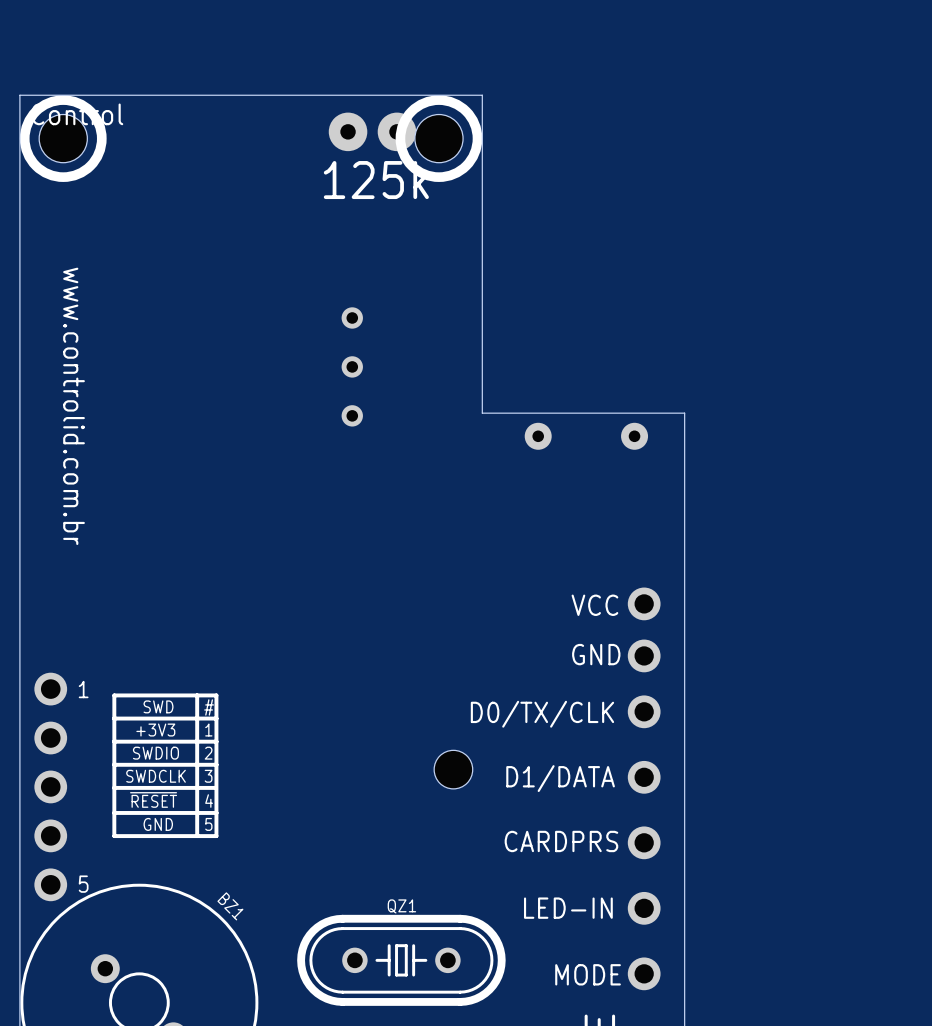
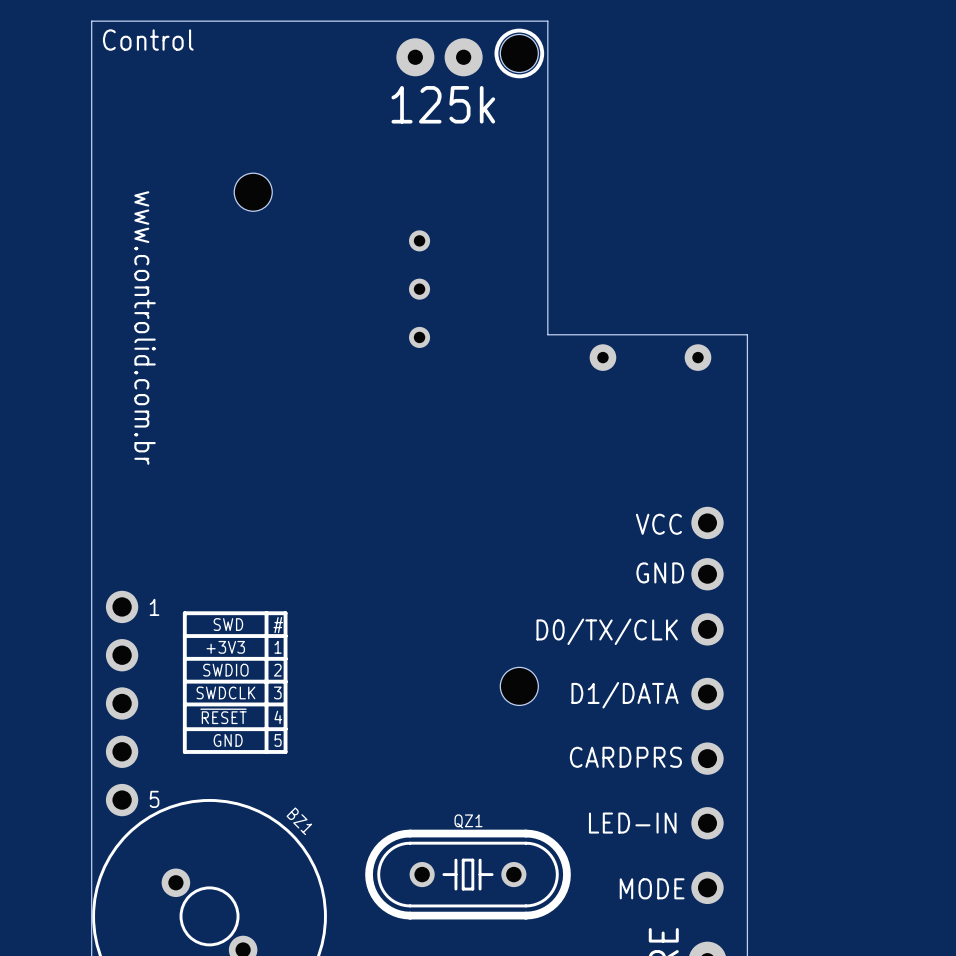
drawing: [19, 95, 107, 182] -> none
drawing shape: [395, 95, 483, 182] -> [494, 28, 545, 79]
hole size: [414, 114, 464, 163] -> [500, 34, 539, 73]
hole: (63, 138) -> none
hole: none -> (253, 192)

